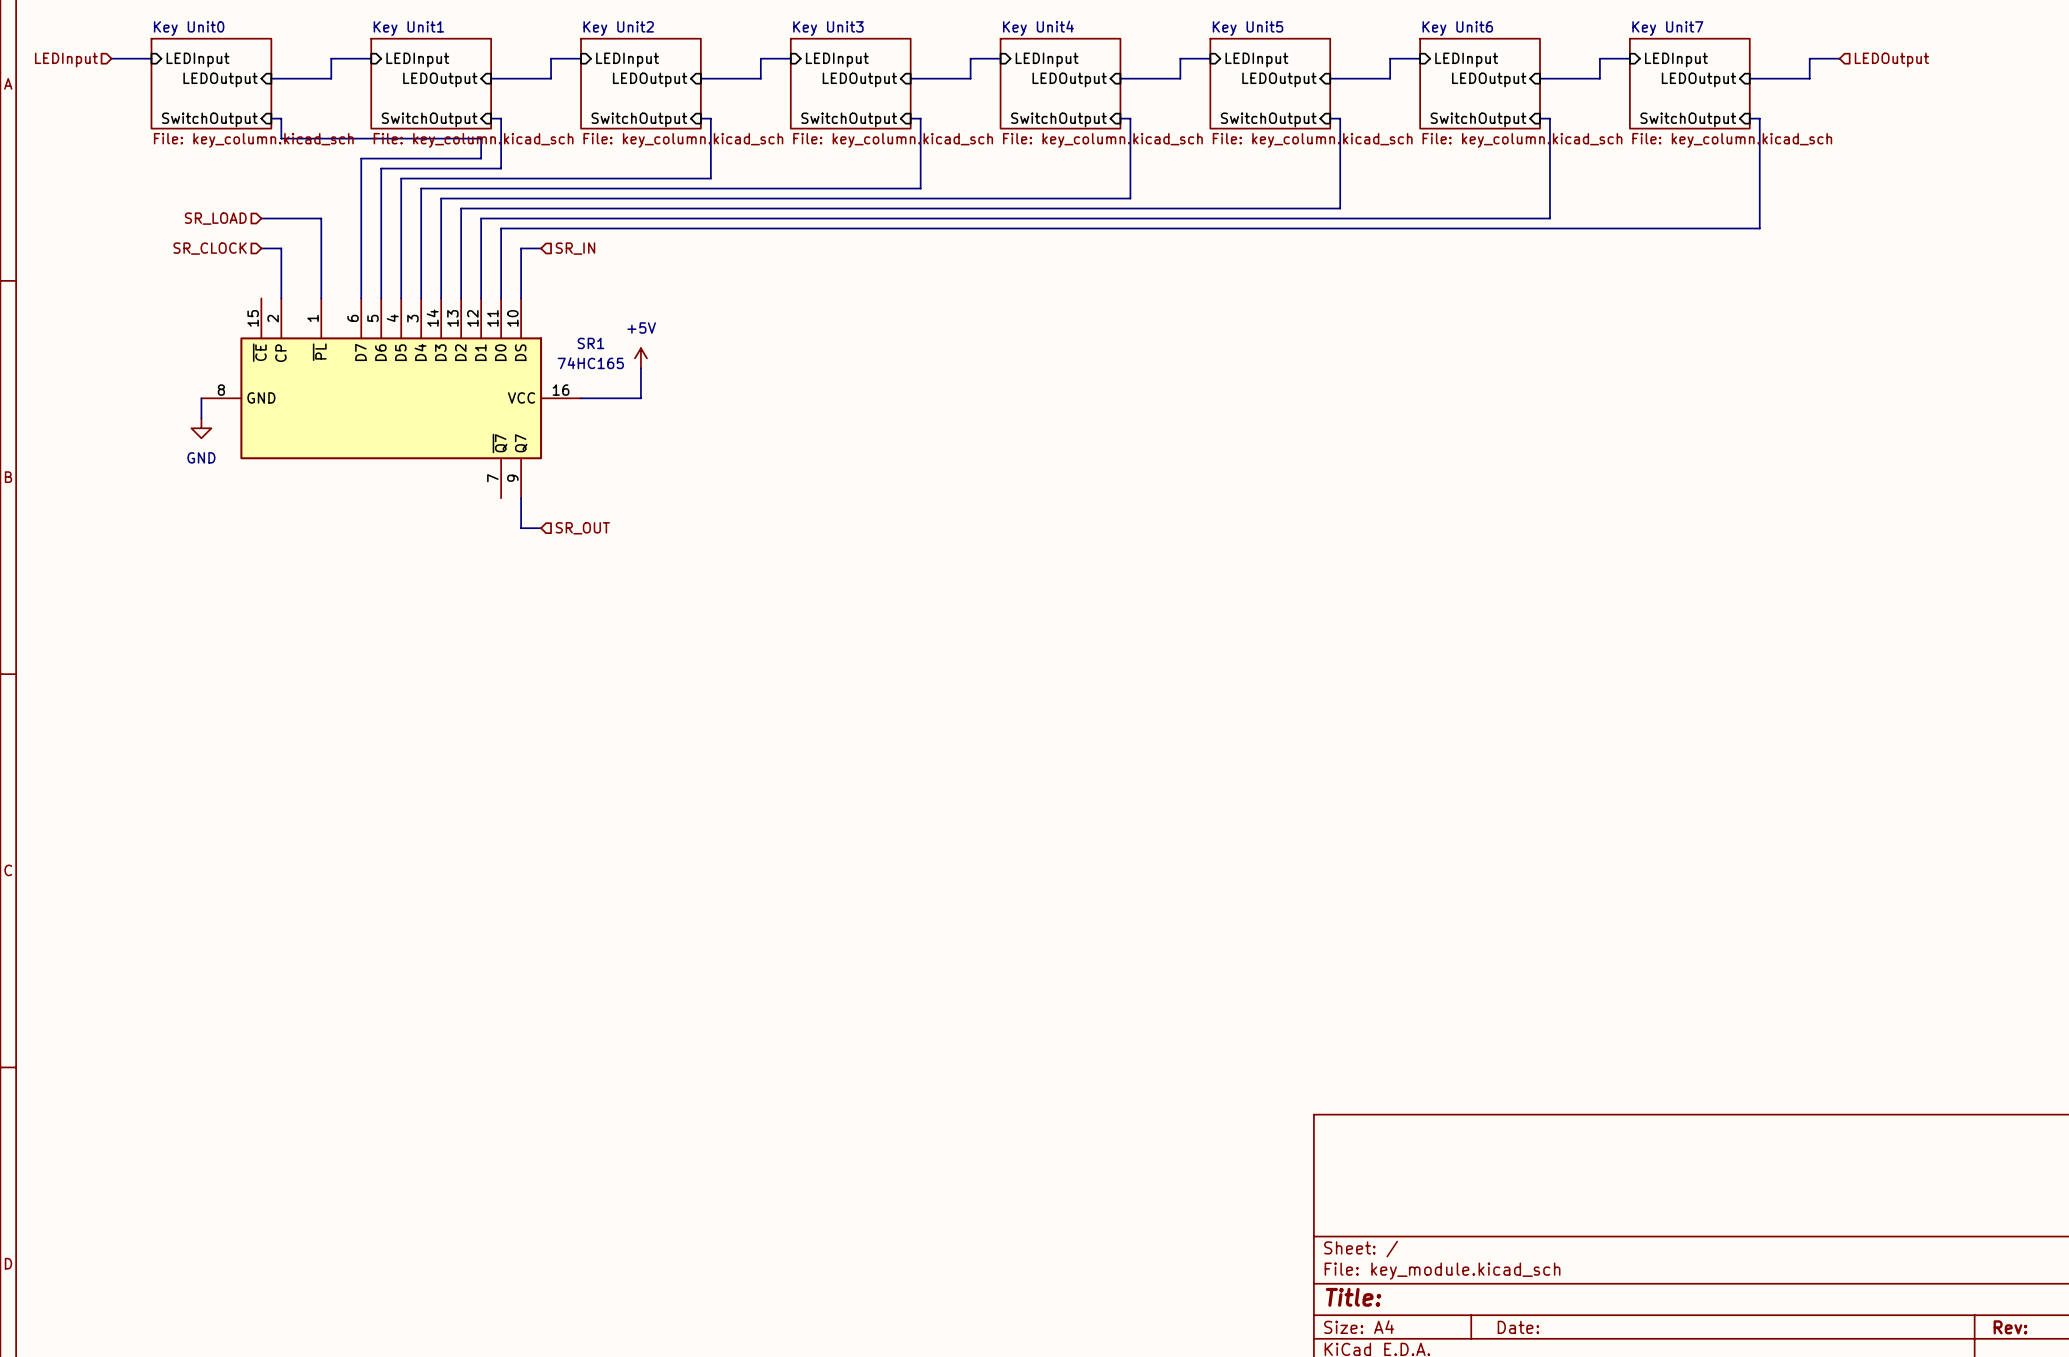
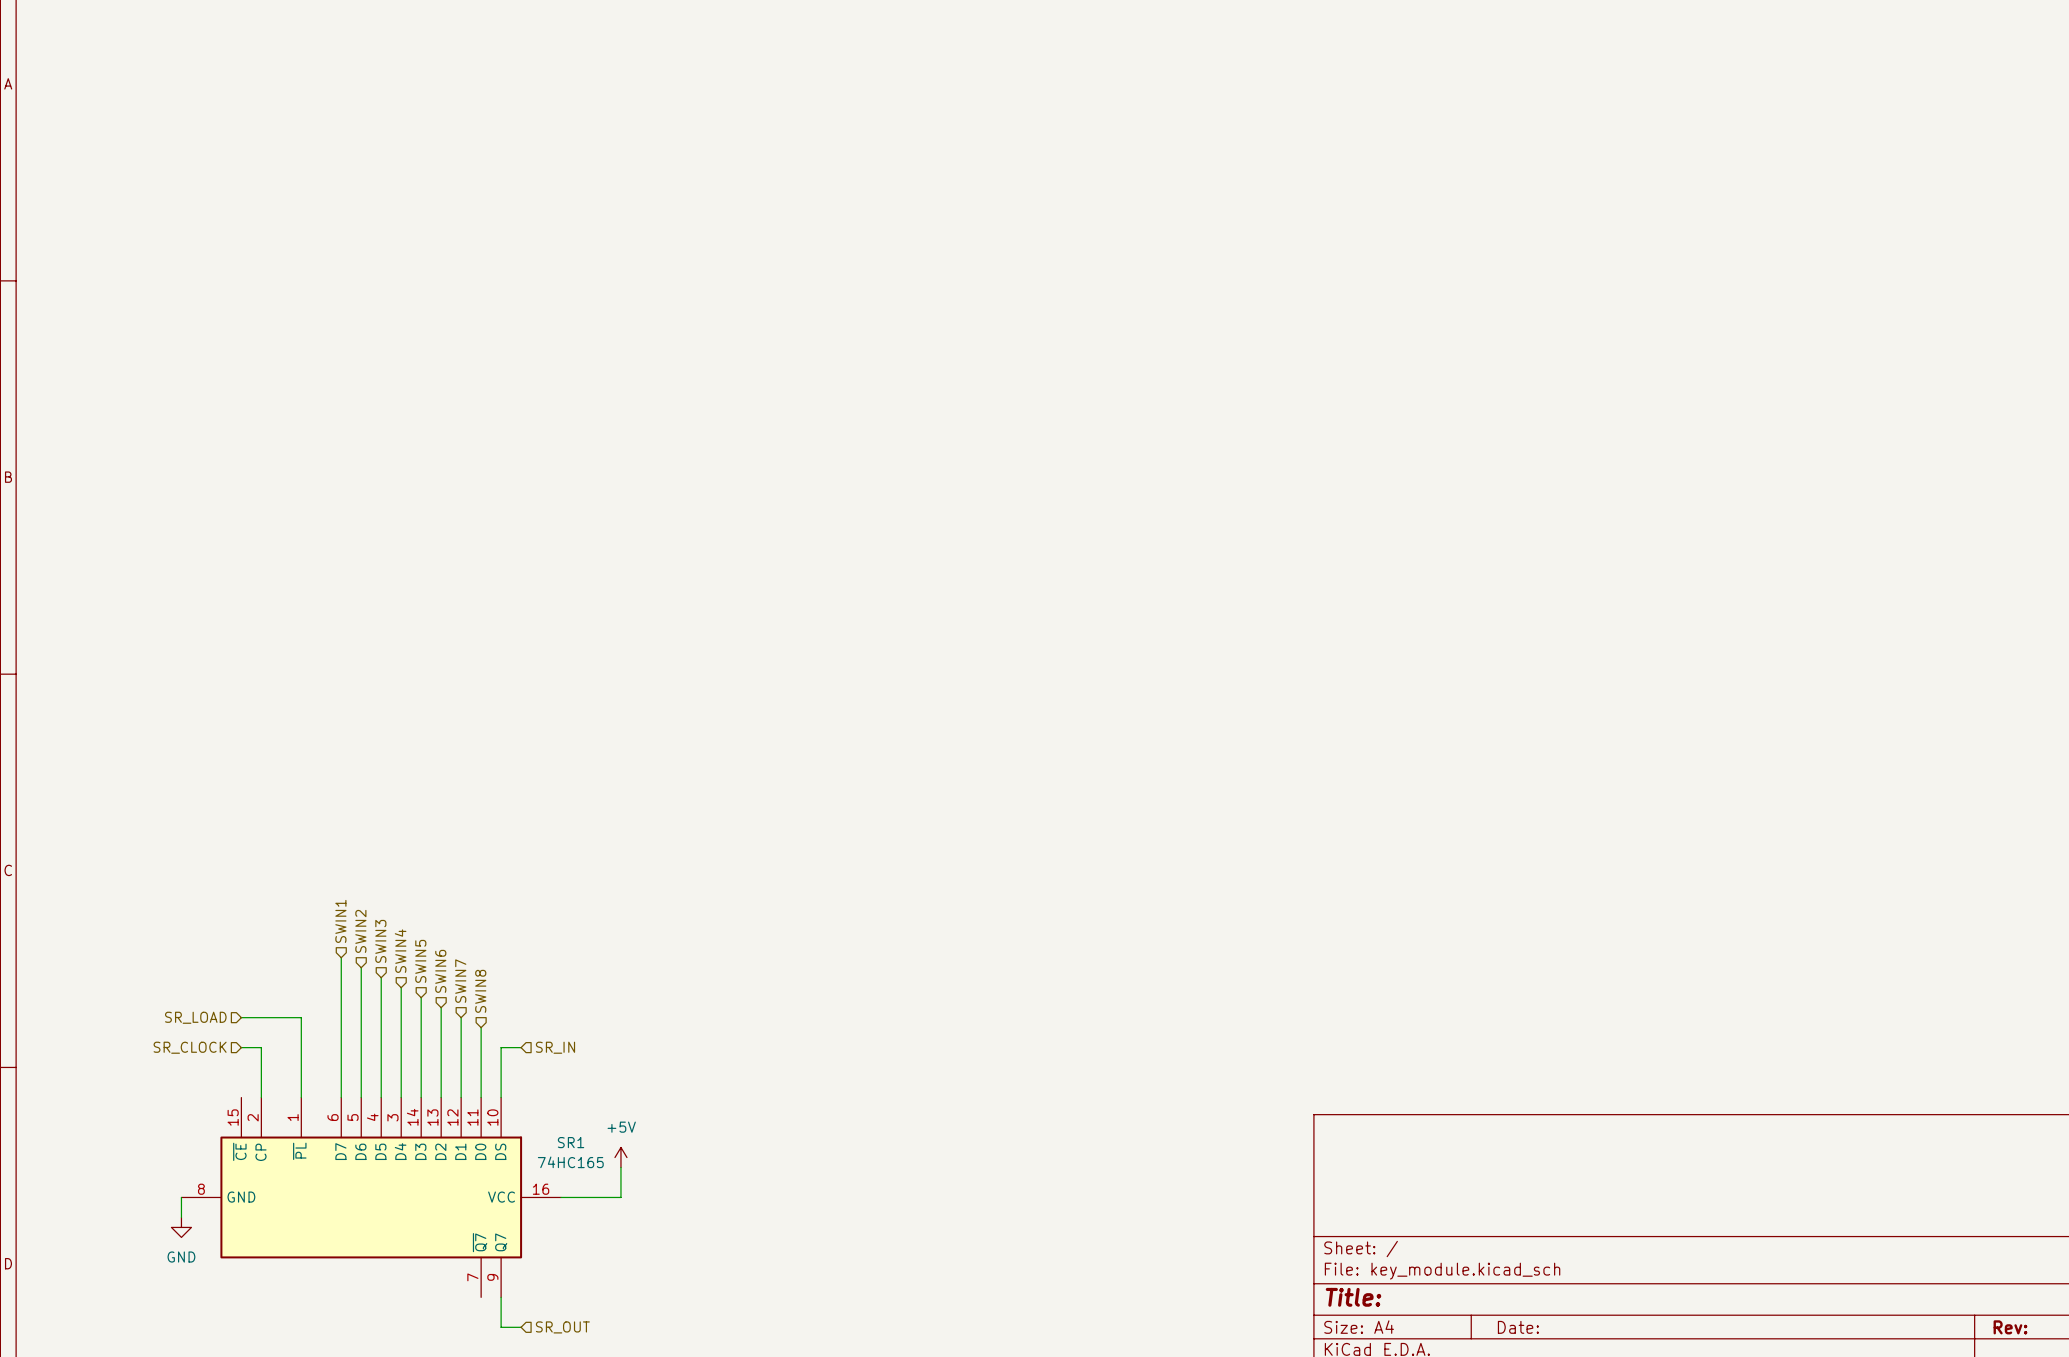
wire: (111, 58) (151, 58) -> none
wire: (371, 58) (331, 58) (331, 78) (271, 78) -> none
wire: (581, 58) (551, 58) (551, 78) (491, 78) -> none
wire: (790, 58) (760, 58) (760, 78) (700, 78) -> none
wire: (1000, 58) (970, 58) (970, 78) (910, 78) -> none
wire: (1210, 58) (1180, 58) (1180, 78) (1120, 78) -> none
wire: (1420, 58) (1390, 58) (1390, 78) (1330, 78) -> none
wire: (1629, 58) (1599, 58) (1599, 78) (1539, 78) -> none
wire: (1839, 58) (1809, 58) (1809, 78) (1749, 78) -> none
hierarchical label: LEDInput (66, 59) -> none
sheet pin: LEDInput (198, 59) -> none
sheet pin: LEDInput (417, 59) -> none
sheet pin: LEDInput (627, 59) -> none
sheet pin: LEDInput (837, 59) -> none
sheet pin: LEDInput (1047, 59) -> none
sheet pin: LEDInput (1256, 59) -> none
sheet pin: LEDInput (1466, 59) -> none
sheet pin: LEDInput (1676, 59) -> none
hierarchical label: LEDOutput (1891, 59) -> none
sheet pin: LEDOutput (220, 79) -> none
sheet pin: LEDOutput (440, 79) -> none
sheet pin: LEDOutput (650, 79) -> none
sheet pin: LEDOutput (859, 79) -> none
sheet pin: LEDOutput (1069, 79) -> none
sheet pin: LEDOutput (1279, 79) -> none
sheet pin: LEDOutput (1489, 79) -> none
sheet pin: LEDOutput (1698, 79) -> none
sheet Key Unit0: File: key_column.kicad_sch (211, 83) -> none
sheet Key Unit1: File: key_column.kicad_sch (431, 83) -> none
sheet Key Unit2: File: key_column.kicad_sch (640, 83) -> none
sheet Key Unit3: File: key_column.kicad_sch (850, 83) -> none
sheet Key Unit4: File: key_column.kicad_sch (1060, 83) -> none
sheet Key Unit5: File: key_column.kicad_sch (1270, 83) -> none
sheet Key Unit6: File: key_column.kicad_sch (1480, 83) -> none
sheet Key Unit7: File: key_column.kicad_sch (1689, 83) -> none
wire: (271, 118) (281, 118) (281, 138) (481, 138) (481, 158) (361, 158) (361, 298) -> none
wire: (491, 118) (501, 118) (501, 168) (381, 168) (381, 298) -> none
wire: (700, 118) (710, 118) (710, 178) (401, 178) (401, 298) -> none
wire: (910, 118) (920, 118) (920, 188) (421, 188) (421, 298) -> none
wire: (1120, 118) (1130, 118) (1130, 198) (441, 198) (441, 298) -> none
wire: (1330, 118) (1340, 118) (1340, 208) (461, 208) (461, 298) -> none
wire: (1539, 118) (1549, 118) (1549, 218) (481, 218) (481, 298) -> none
wire: (1749, 118) (1759, 118) (1759, 228) (501, 228) (501, 298) -> none
sheet pin: SwitchOutput (209, 119) -> none
sheet pin: SwitchOutput (429, 119) -> none
sheet pin: SwitchOutput (639, 119) -> none
sheet pin: SwitchOutput (849, 119) -> none
sheet pin: SwitchOutput (1058, 119) -> none
sheet pin: SwitchOutput (1268, 119) -> none
sheet pin: SwitchOutput (1478, 119) -> none
sheet pin: SwitchOutput (1688, 119) -> none
hierarchical label: SR_LOAD (215, 218) -> none
wire: (261, 218) (321, 218) (321, 298) -> none
hierarchical label: SR_CLOCK (210, 248) -> none
wire: (261, 248) (281, 248) (281, 298) -> none
wire: (541, 248) (521, 248) (521, 298) -> none
hierarchical label: SR_IN (575, 248) -> none
power symbol: +5V (640, 358) -> none
wire: (640, 368) (640, 398) (581, 398) -> none
wire: (201, 398) (201, 418) -> none
SR1 position: (391, 398) -> (371, 1197)
power symbol: GND (201, 428) -> none
wire: (521, 498) (521, 528) (541, 528) -> none
hierarchical label: SR_OUT (582, 528) -> none
hierarchical label: none -> SWIN1 (340, 921)
hierarchical label: none -> SWIN2 (360, 931)
hierarchical label: none -> SWIN3 (380, 941)
hierarchical label: none -> SWIN4 (400, 951)
wire: none -> (341, 957) (341, 1097)
hierarchical label: none -> SWIN5 (420, 961)
wire: none -> (361, 967) (361, 1097)
hierarchical label: none -> SWIN6 (440, 971)
wire: none -> (381, 977) (381, 1097)
hierarchical label: none -> SWIN7 (460, 981)
wire: none -> (401, 987) (401, 1097)
hierarchical label: none -> SWIN8 (480, 991)
wire: none -> (421, 997) (421, 1097)
wire: none -> (441, 1007) (441, 1097)
hierarchical label: none -> SR_LOAD (195, 1017)
wire: none -> (241, 1017) (301, 1017) (301, 1097)
wire: none -> (461, 1017) (461, 1097)
wire: none -> (481, 1027) (481, 1097)
hierarchical label: none -> SR_CLOCK (190, 1047)
wire: none -> (241, 1047) (261, 1047) (261, 1097)
wire: none -> (521, 1047) (501, 1047) (501, 1097)
hierarchical label: none -> SR_IN (555, 1047)
power symbol: none -> +5V (620, 1157)
wire: none -> (620, 1167) (620, 1197) (561, 1197)
wire: none -> (181, 1197) (181, 1217)
power symbol: none -> GND (181, 1227)
wire: none -> (501, 1297) (501, 1327) (521, 1327)
hierarchical label: none -> SR_OUT (562, 1327)

